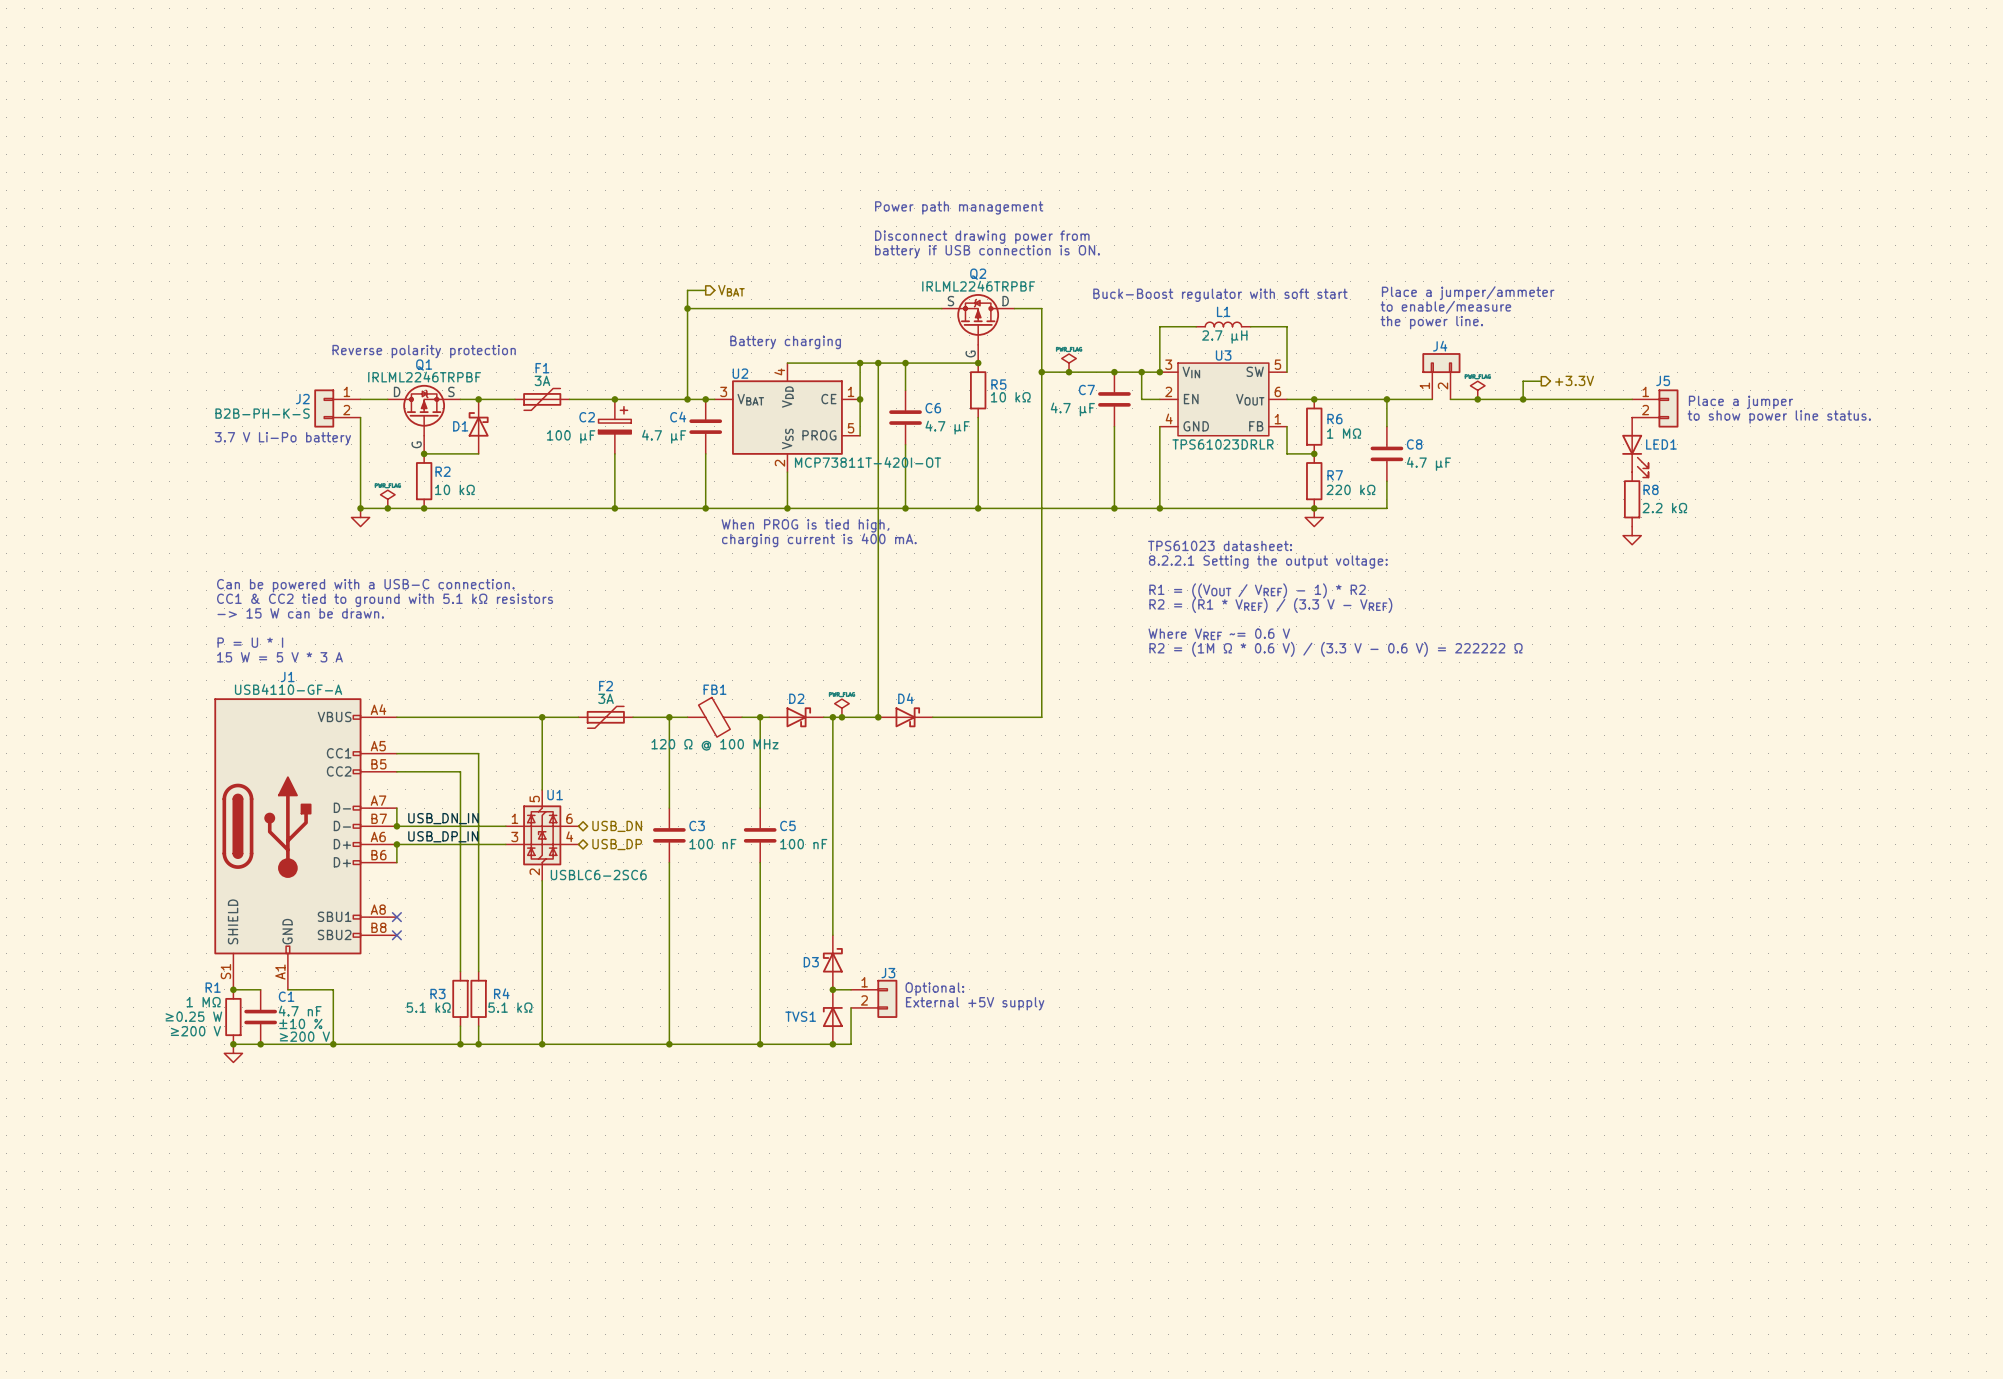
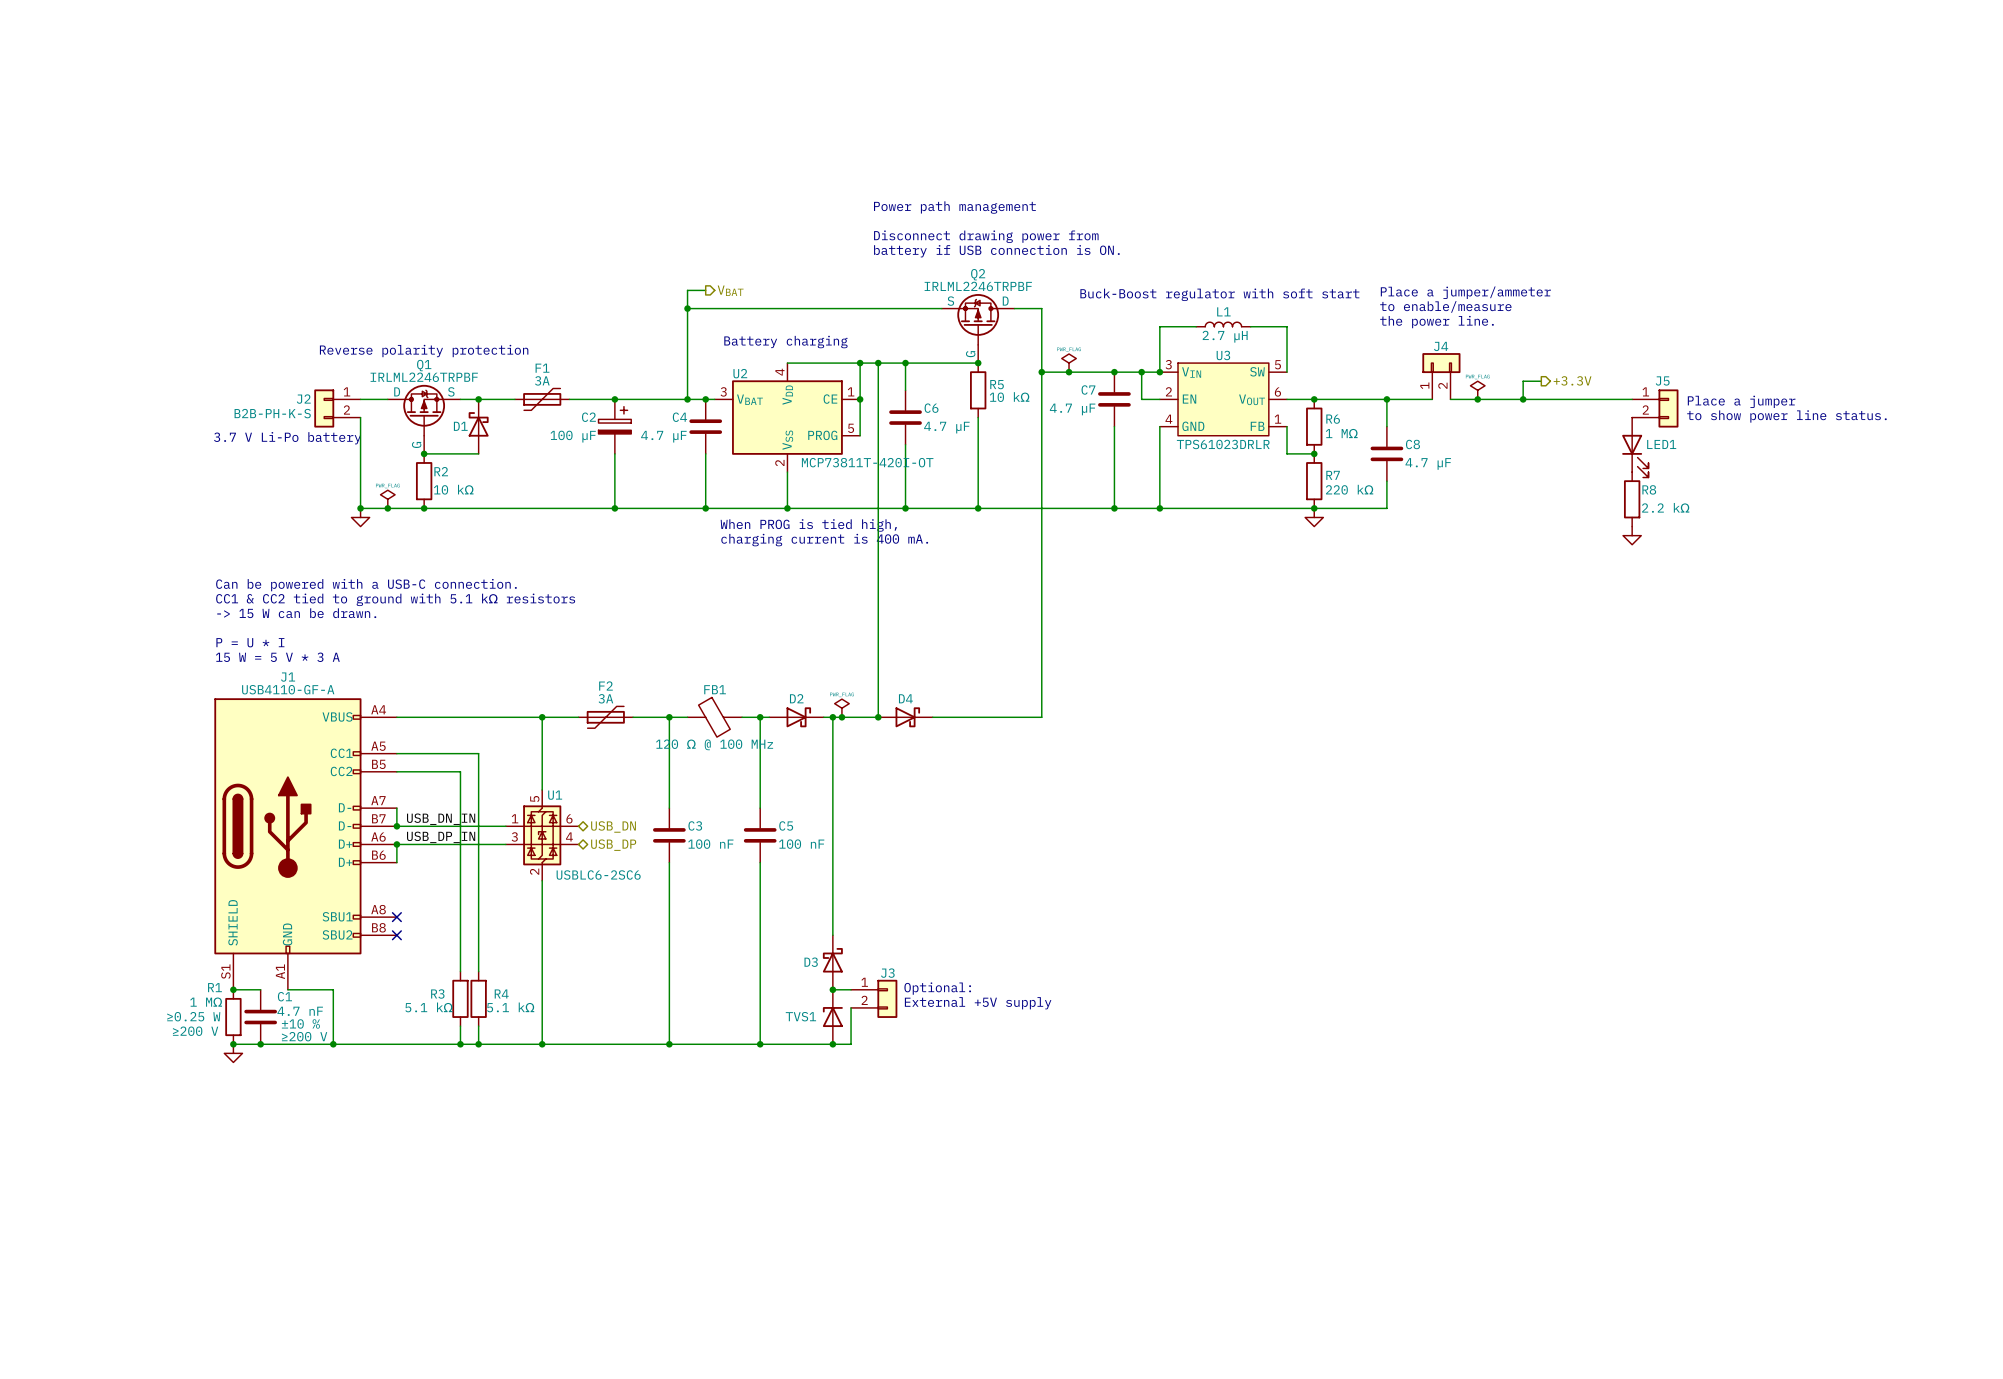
text: TPS61023 datasheet: (1220, 545) -> none
text: 8.2.2.1 Setting the output voltage: (1268, 562) -> none
text: R1 = ((VOUT / VREF) - 1) * R2 (1257, 590) -> none
text: R2 = (R1 * VREF) / (3.3 V - VREF) (1270, 605) -> none
text: Where VREF ~= 0.6 V (1219, 634) -> none
text: R2 = (1M Ω * 0.6 V) / (3.3 V - 0.6 V) = 222222 Ω (1335, 649) -> none

